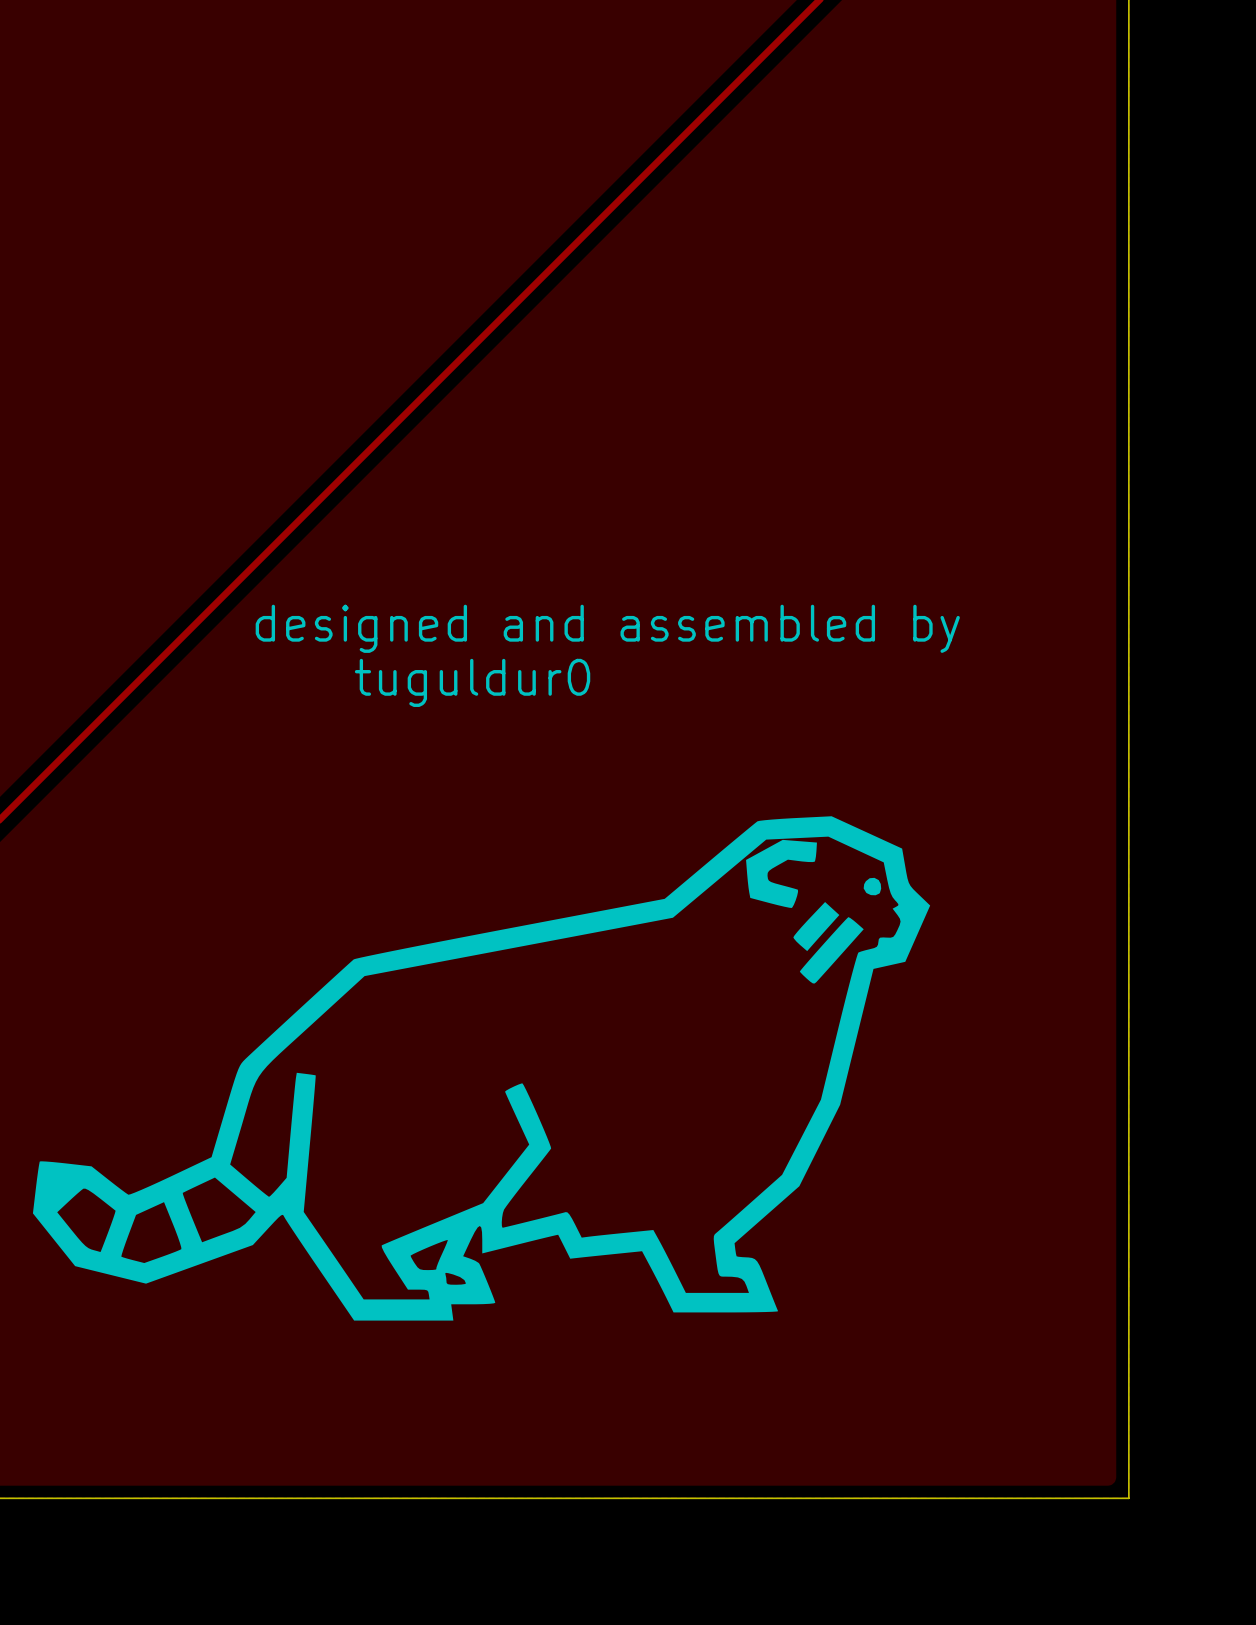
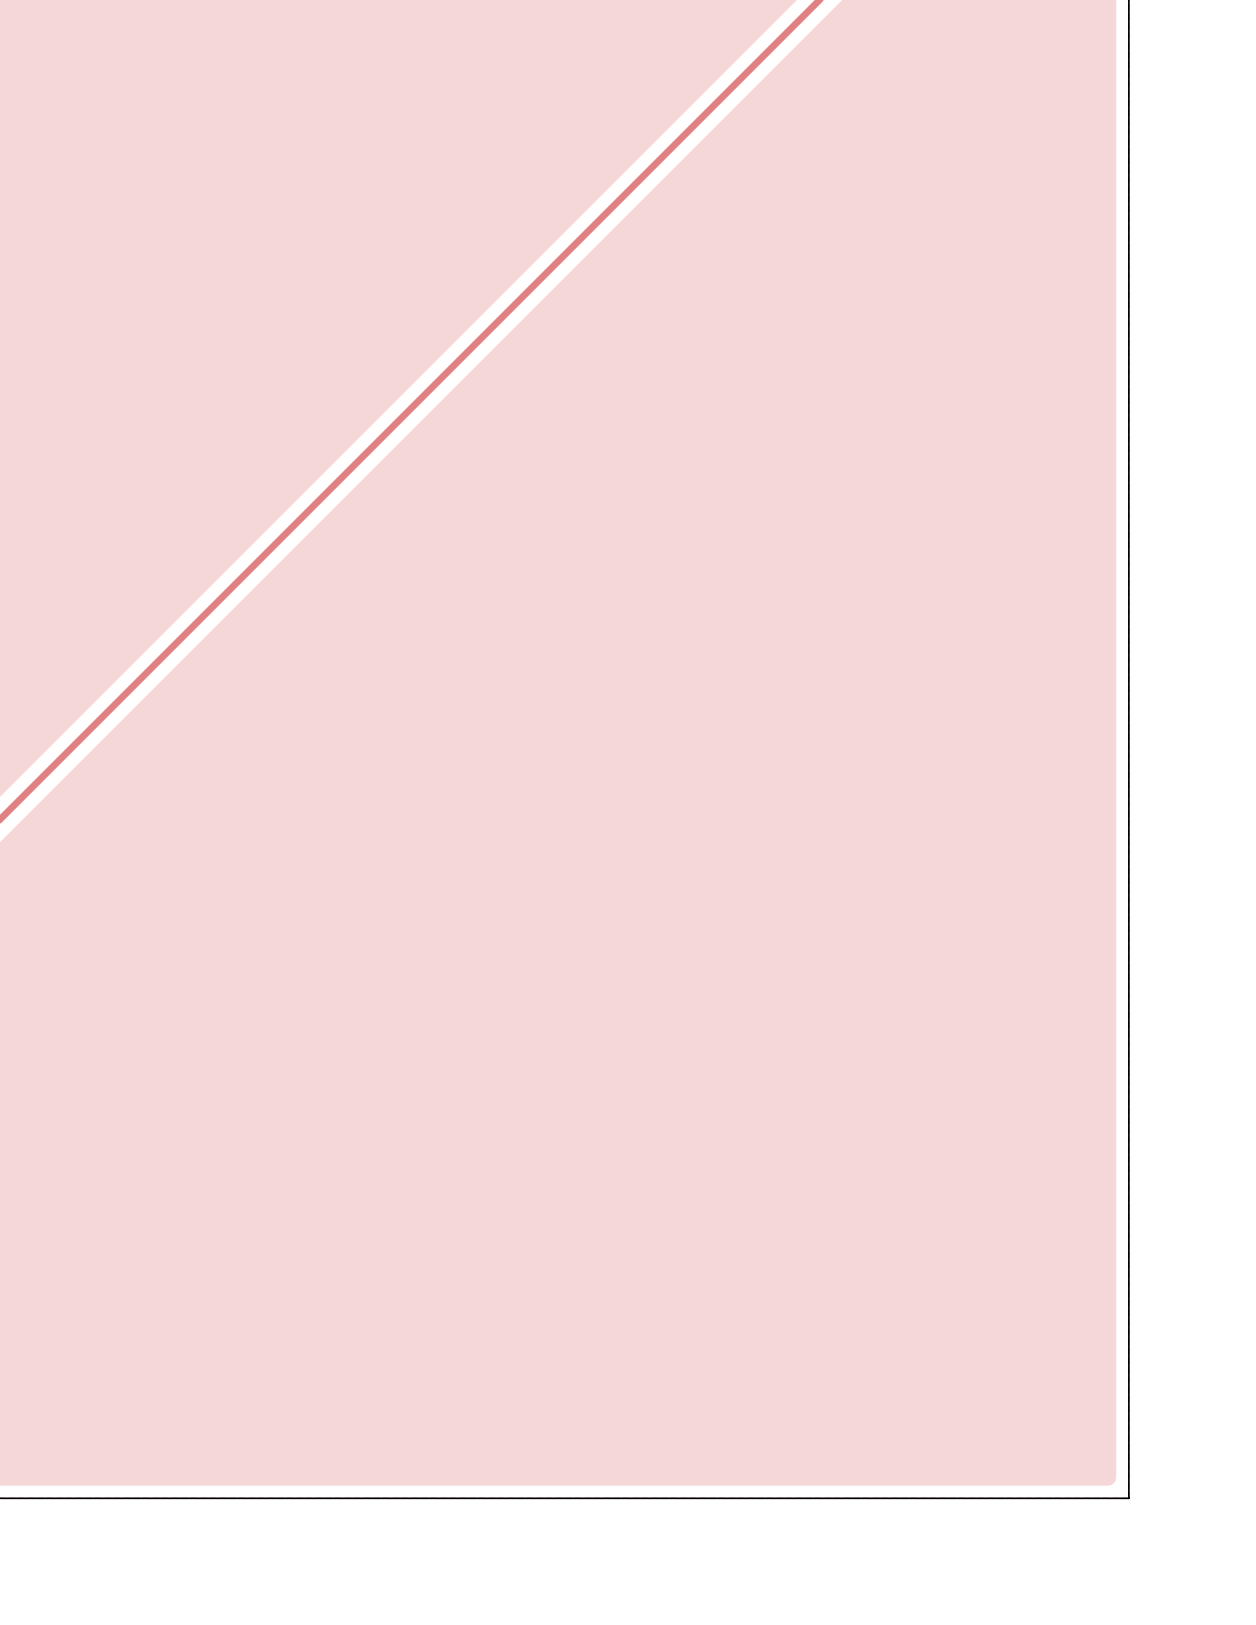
text: designed and assembled by (607, 628) -> none
text: tuguldur0 (472, 682) -> none
drawing: [32, 816, 931, 1321] -> none

